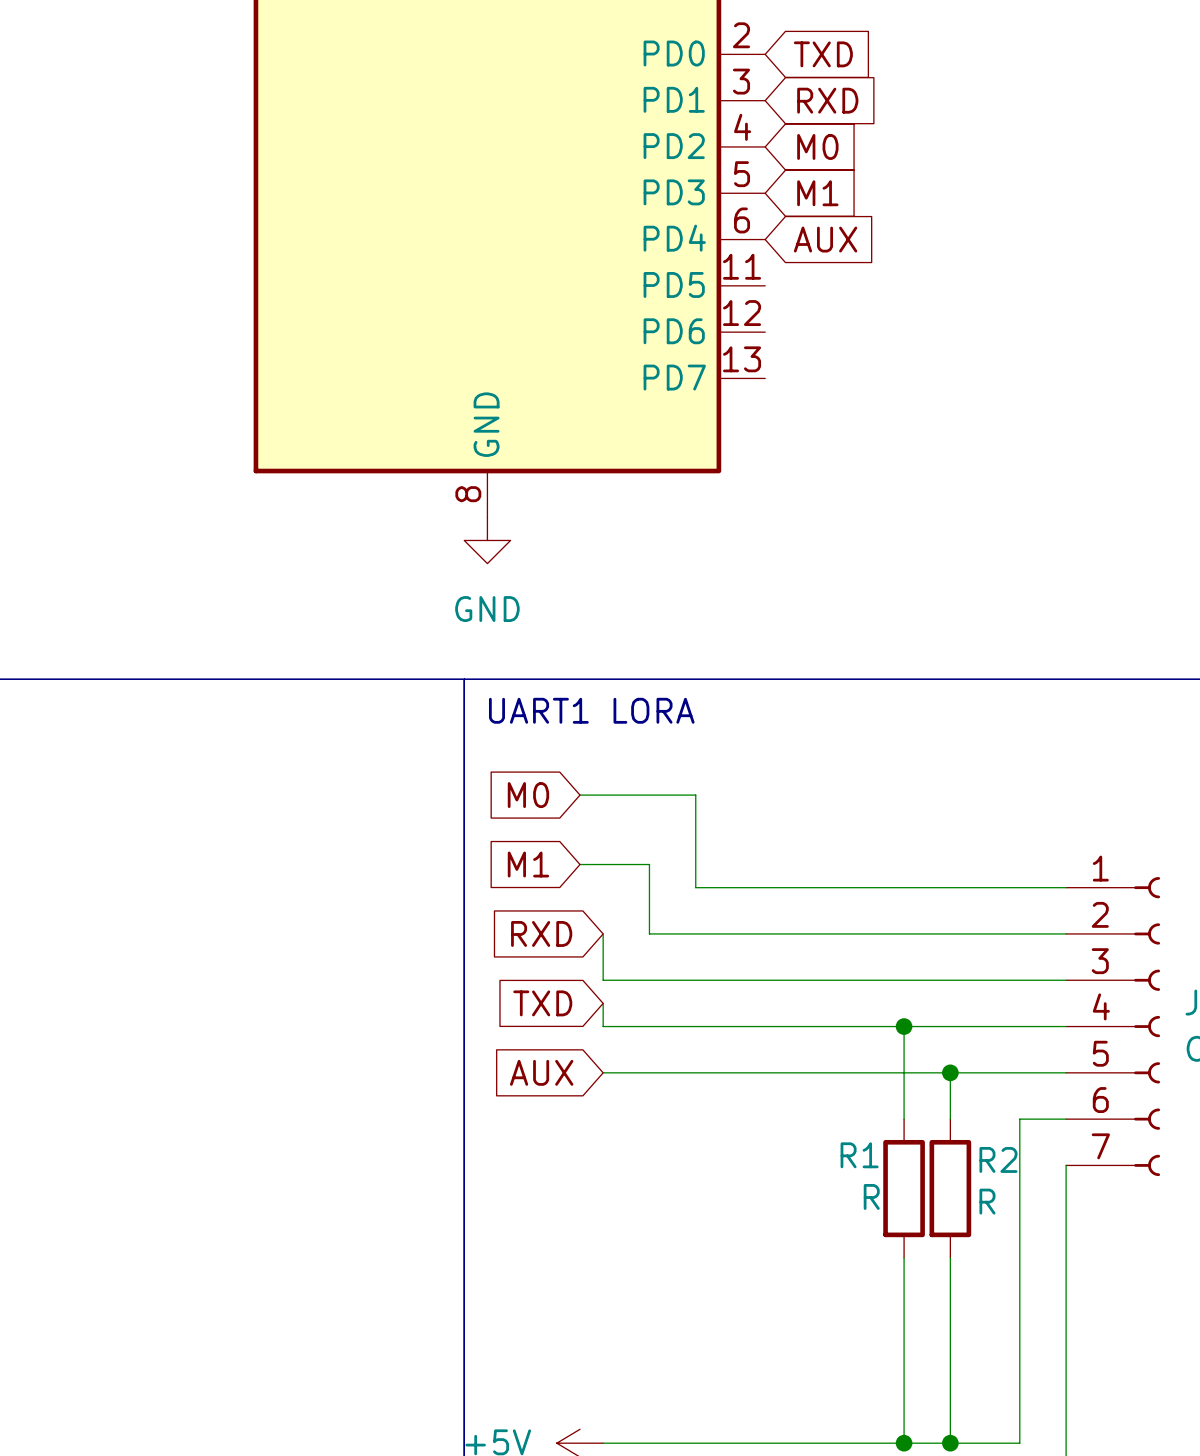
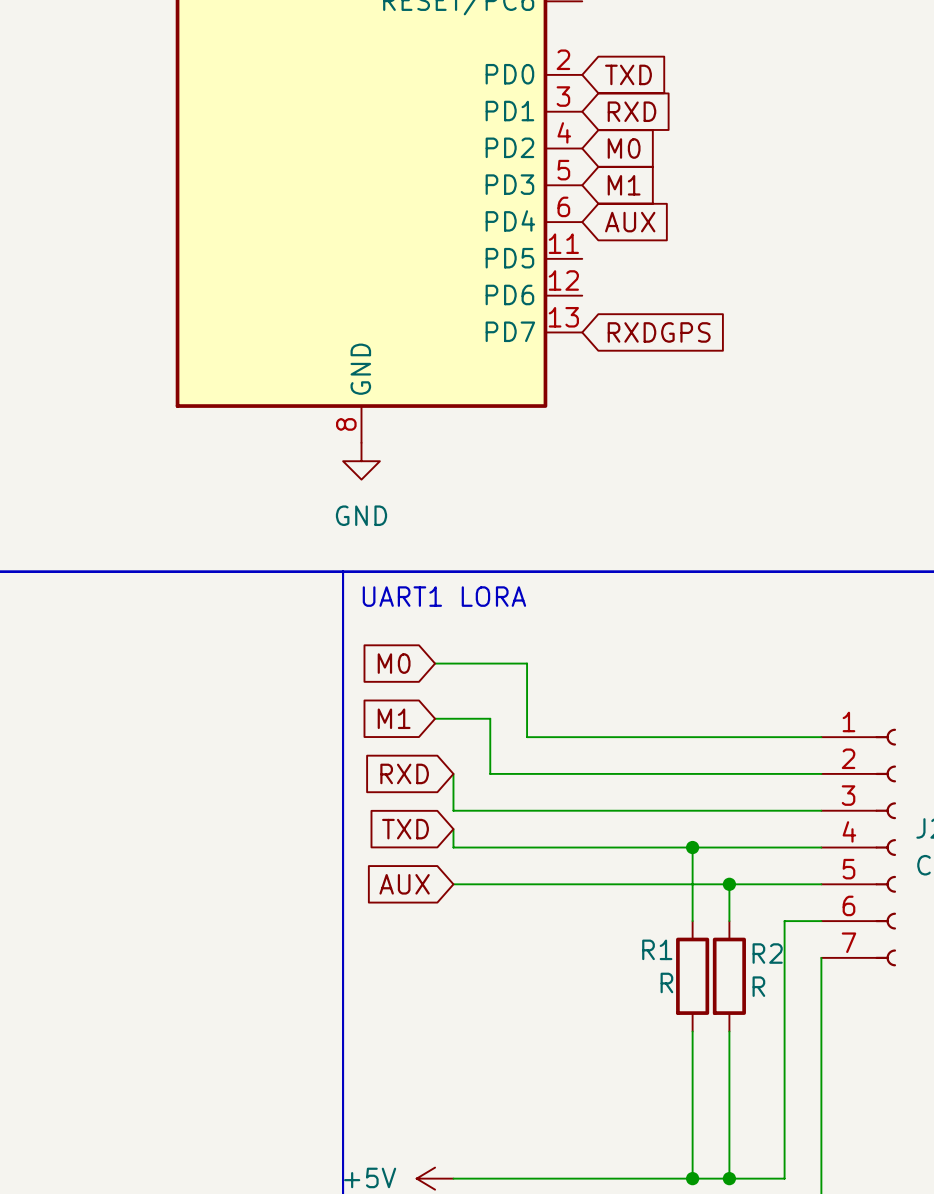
global label: none -> RXDGPS (659, 332)

